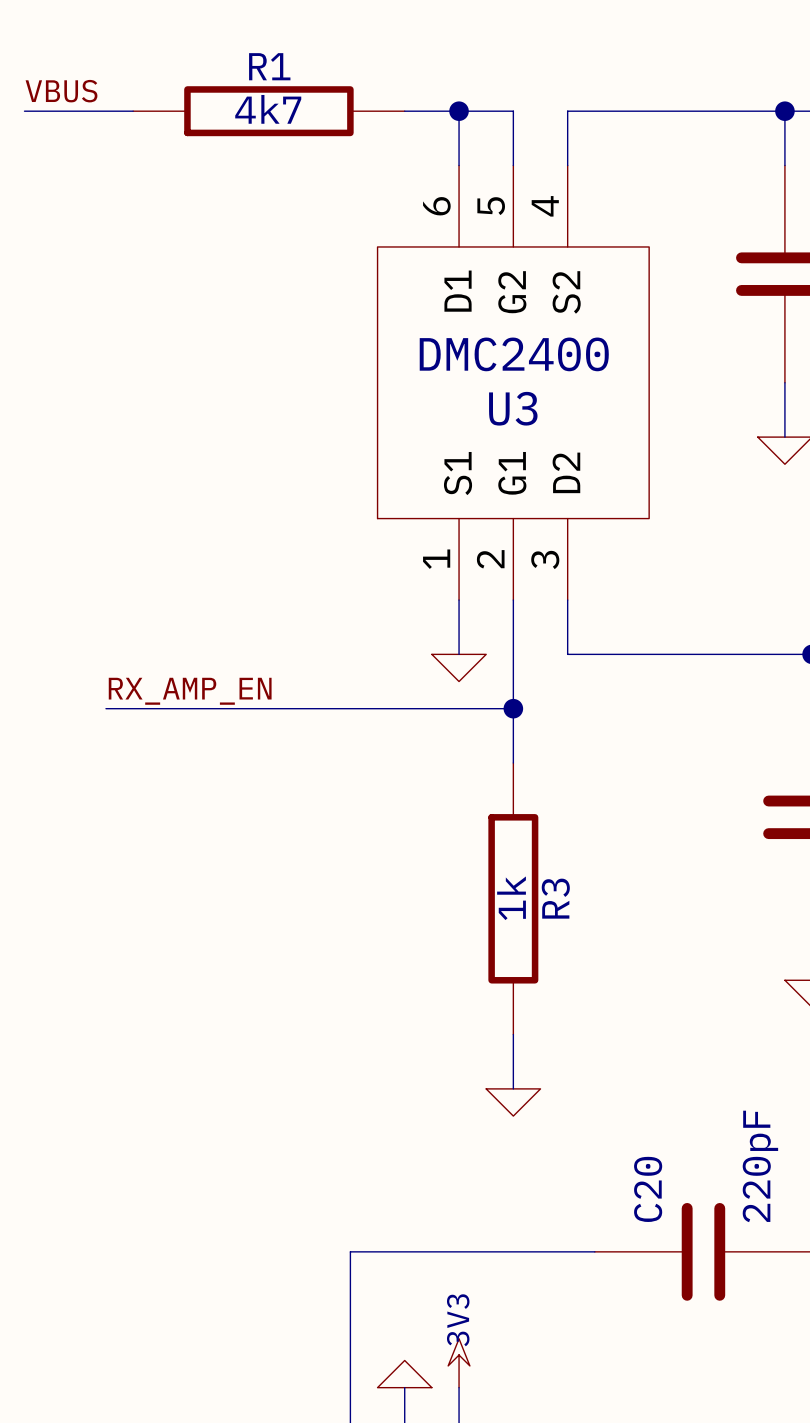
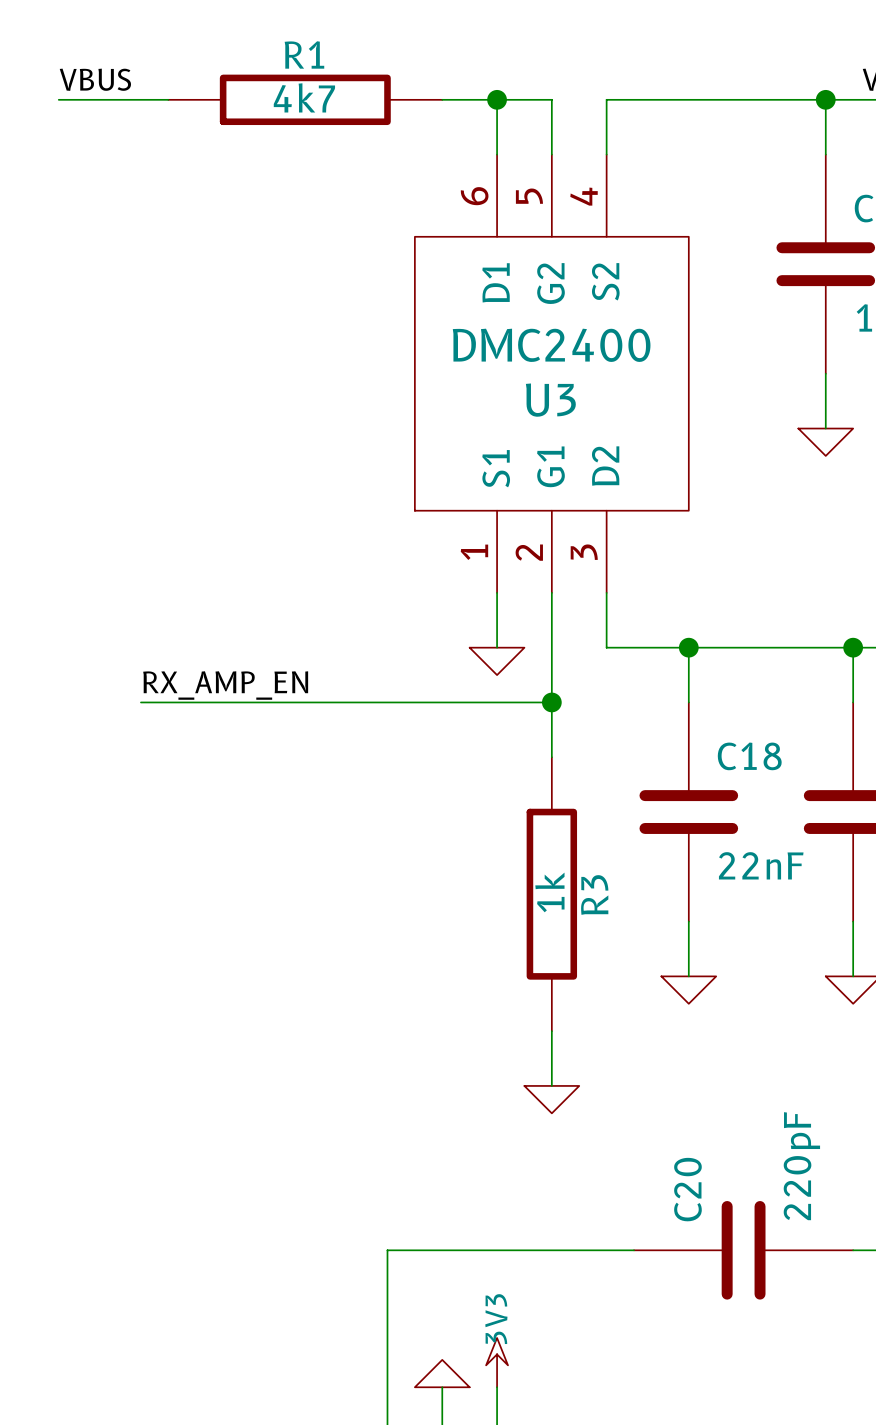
wire: none -> (688, 647) (688, 702)
junction: none -> (688, 647)
C18: none -> 22nF (688, 812)
wire: none -> (688, 921) (688, 976)
power symbol: none -> (688, 990)

